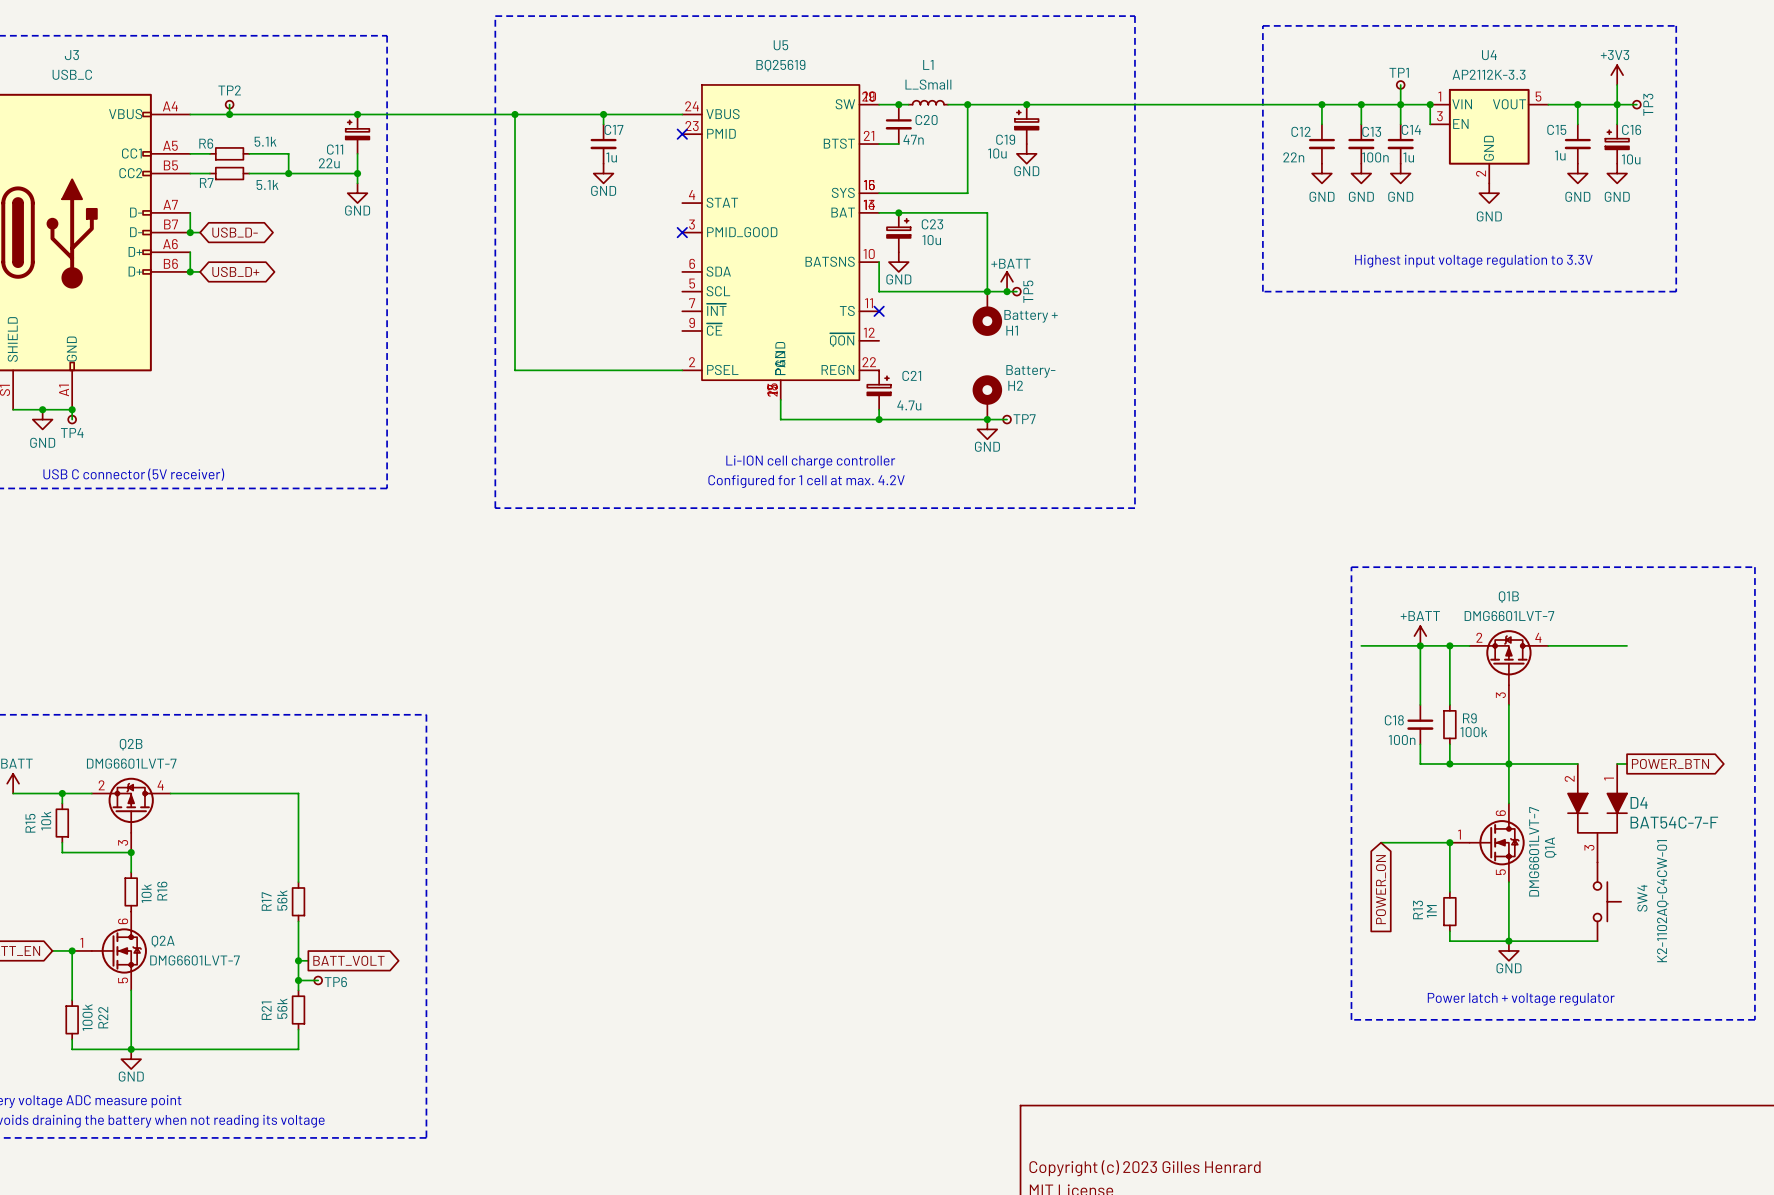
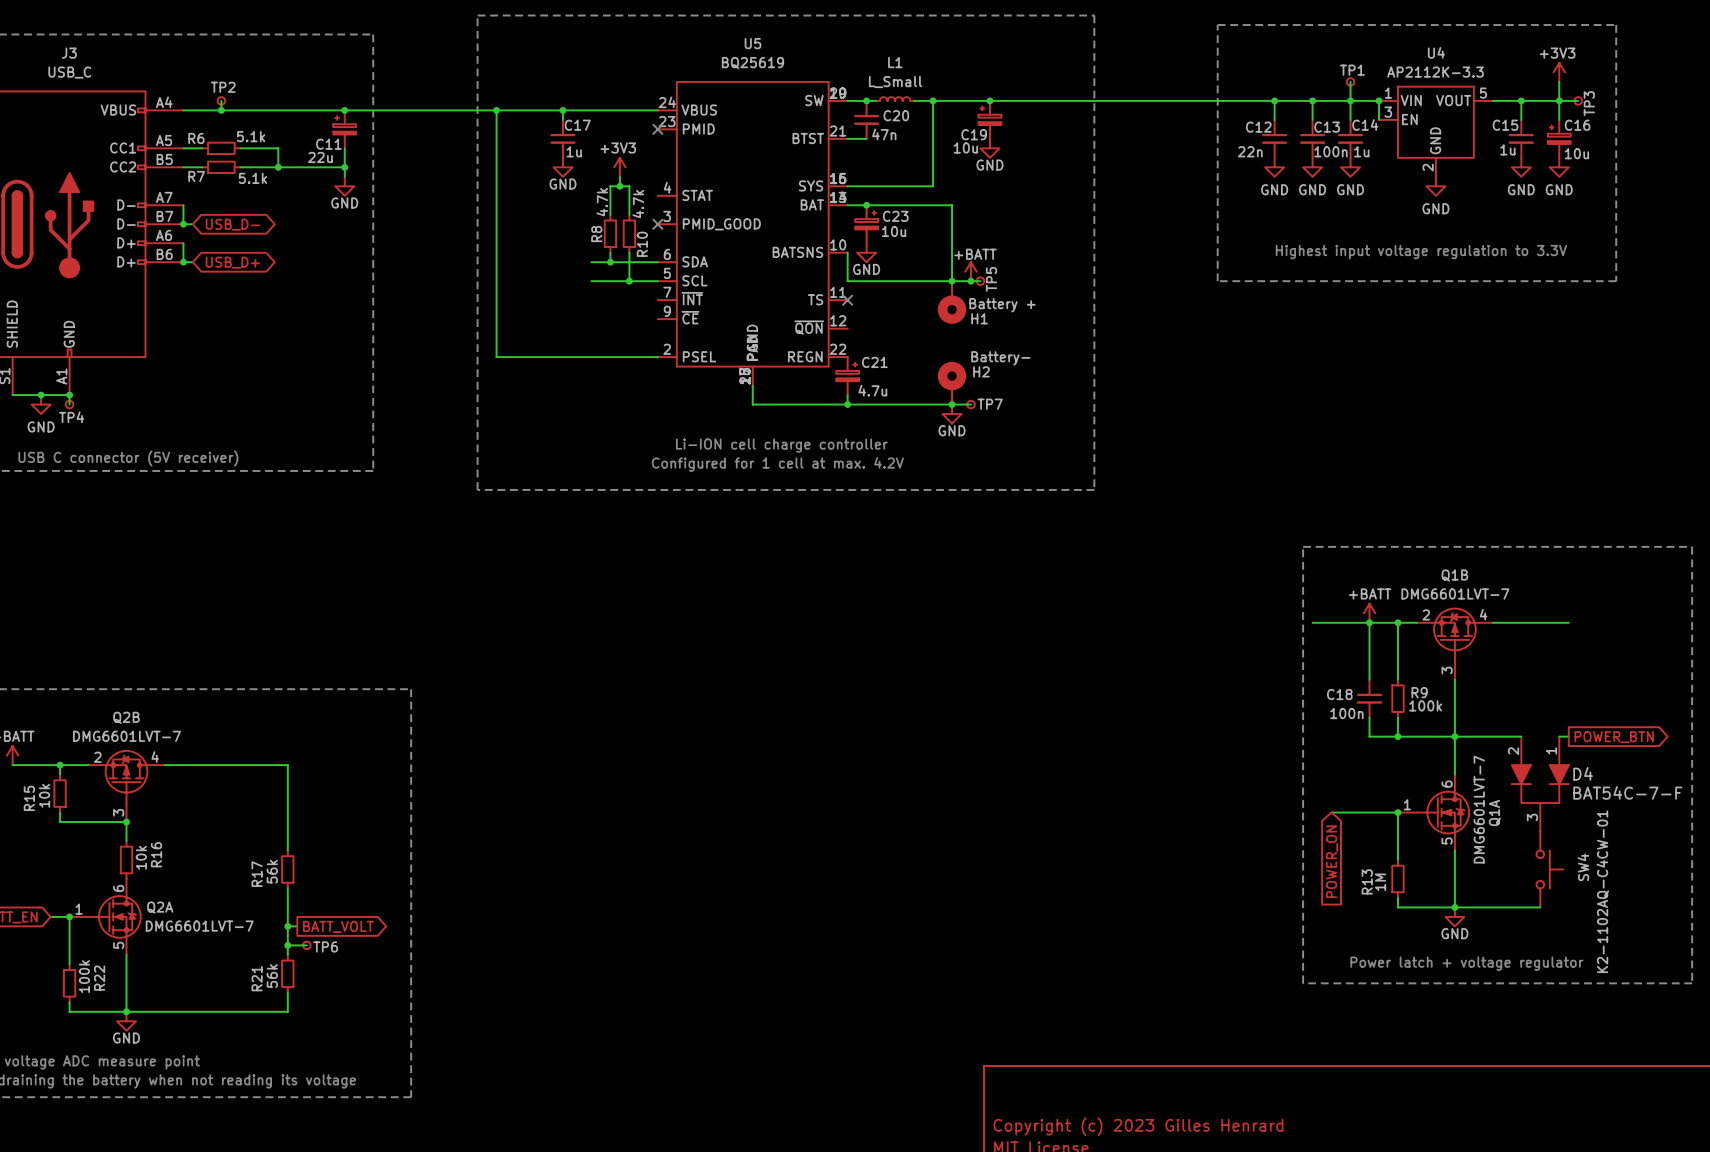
wire: (603, 114) (603, 124) -> (562, 110) (562, 119)
junction position: (603, 114) -> (562, 110)
C17 position: (603, 144) -> (562, 138)
power symbol position: GND (603, 173) -> GND (562, 167)
power symbol: none -> +3V3 (619, 167)
wire: none -> (619, 176) (619, 186)
junction: none -> (619, 186)
wire: none -> (610, 214) (610, 186) (629, 186) (629, 214)
R8: none -> 4.7k (610, 233)
R10: none -> 4.7k (629, 233)
wire: none -> (610, 252) (610, 262)
wire: none -> (629, 252) (629, 281)
wire: none -> (591, 262) (657, 262)
junction: none -> (610, 262)
wire: none -> (591, 281) (657, 281)
junction: none -> (629, 281)

